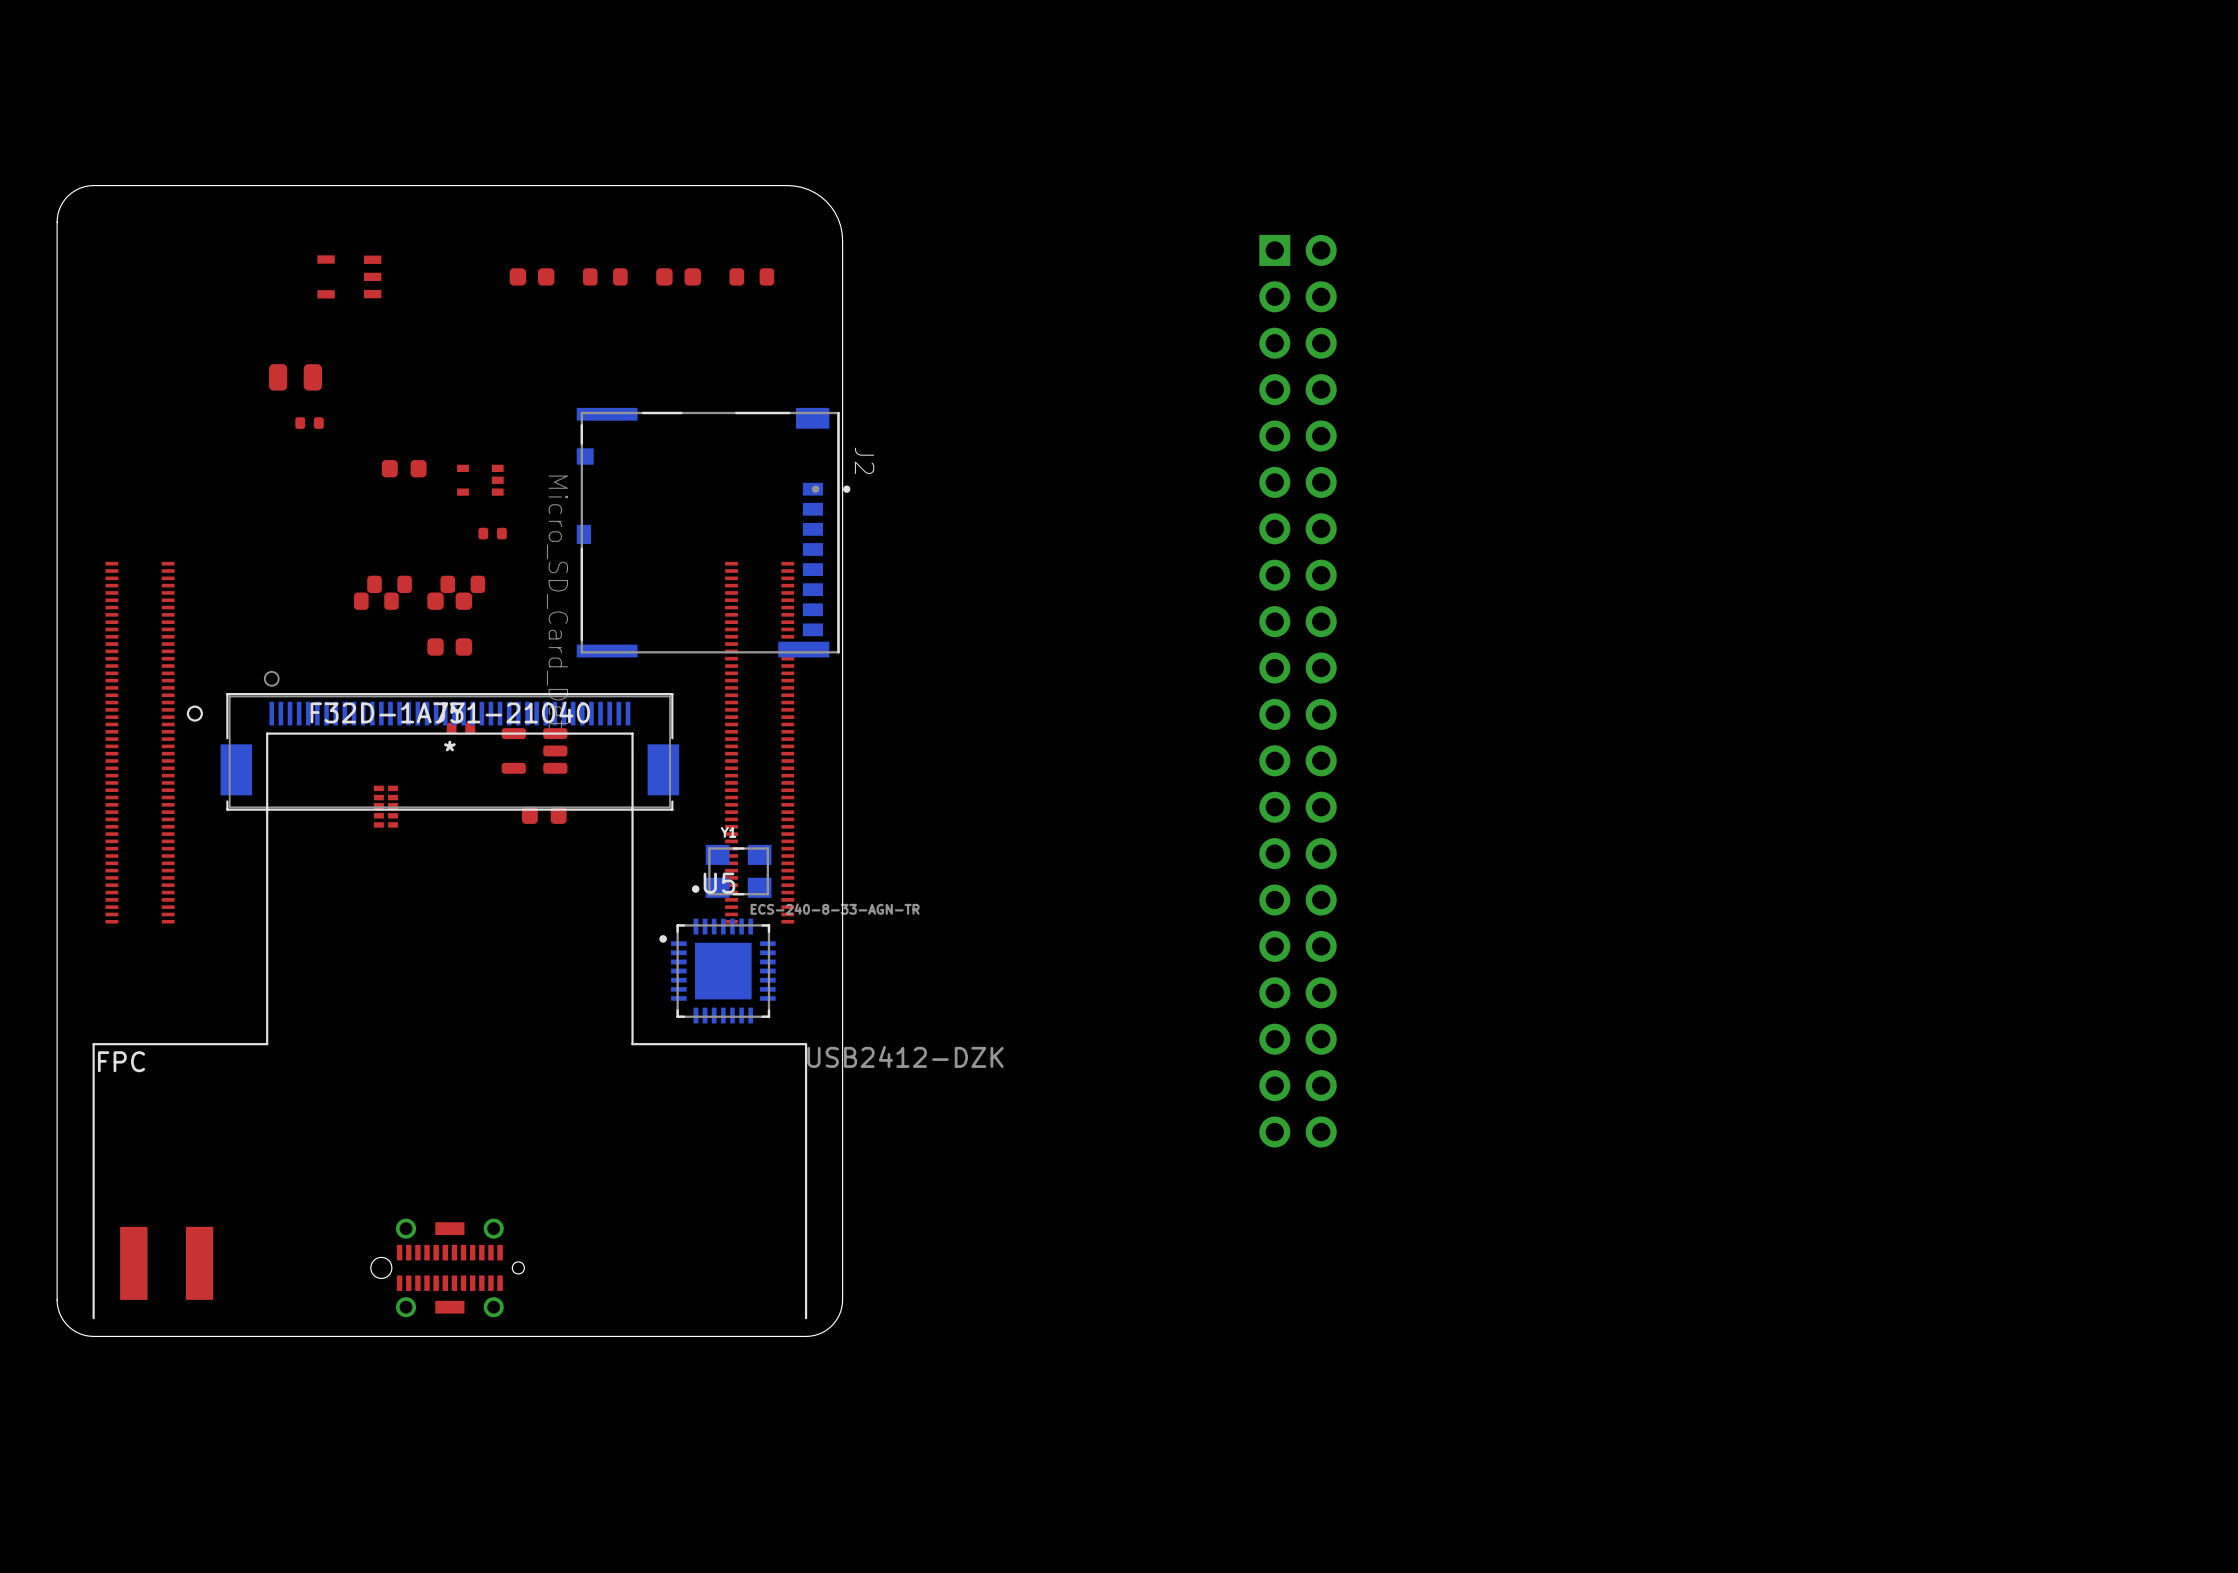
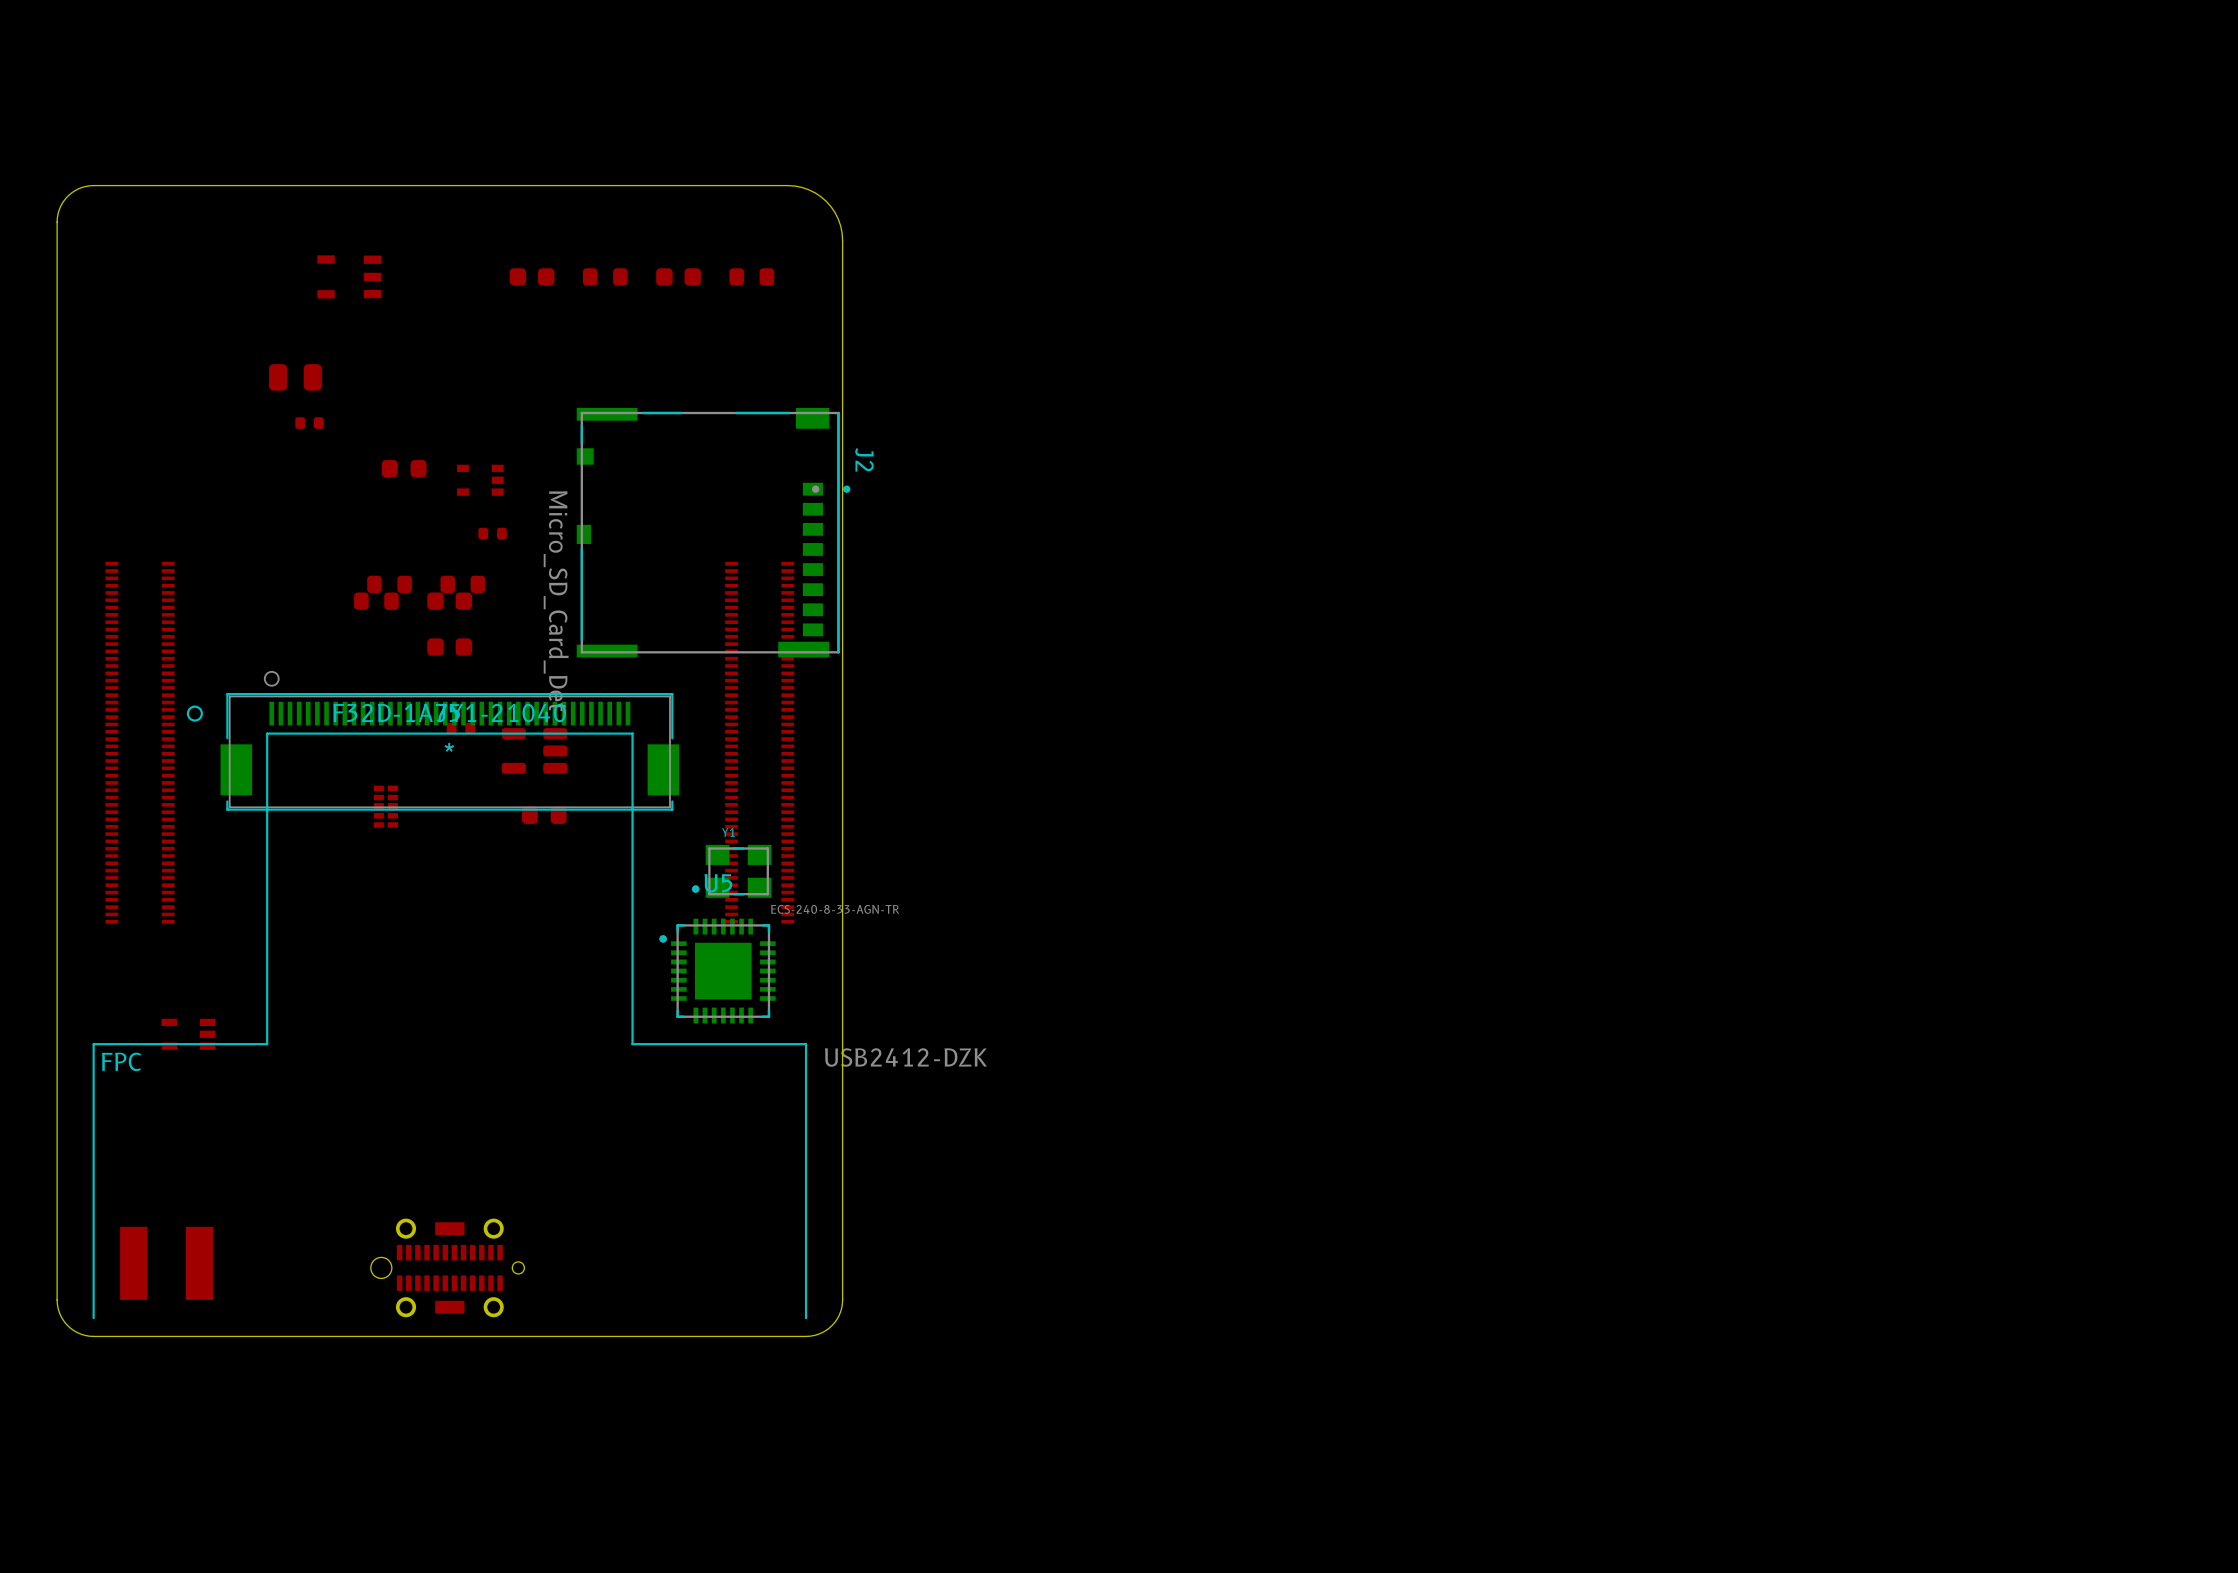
part: (1298, 691) -> none
part: none -> (188, 1034)

